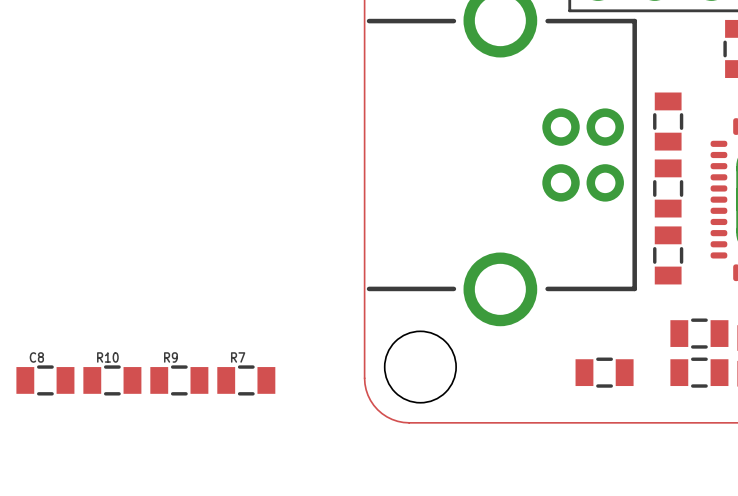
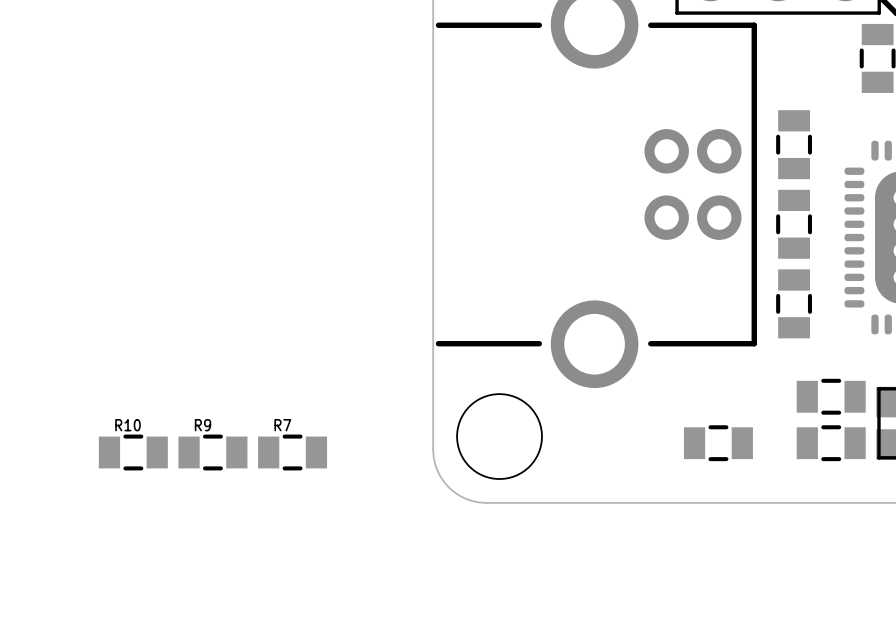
C8: (45, 380) -> none

